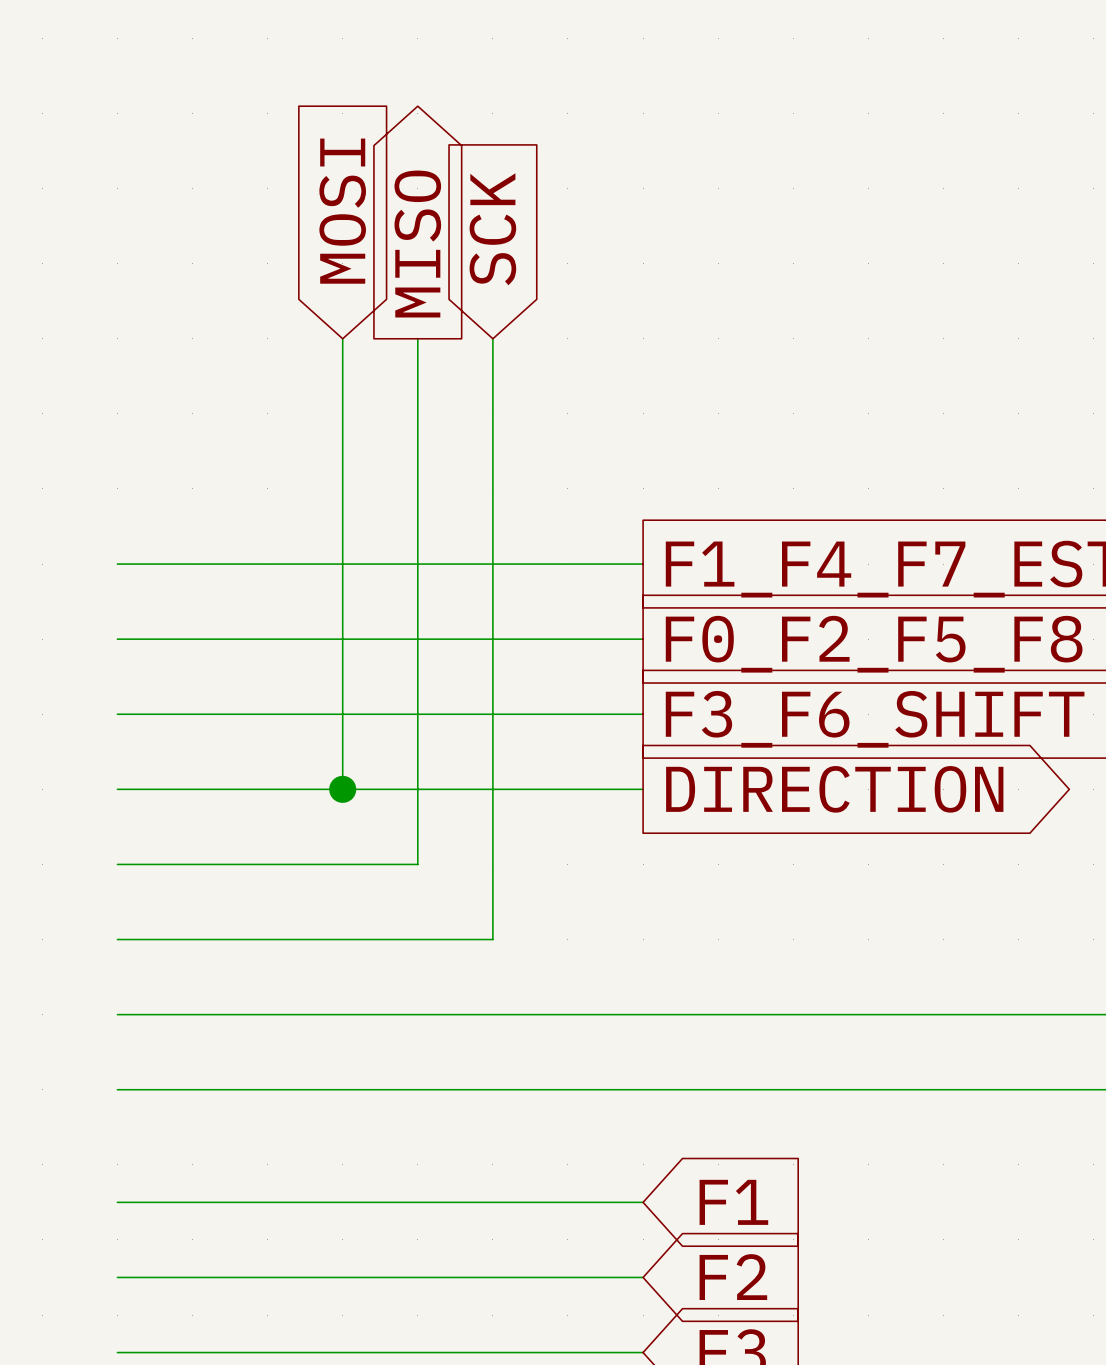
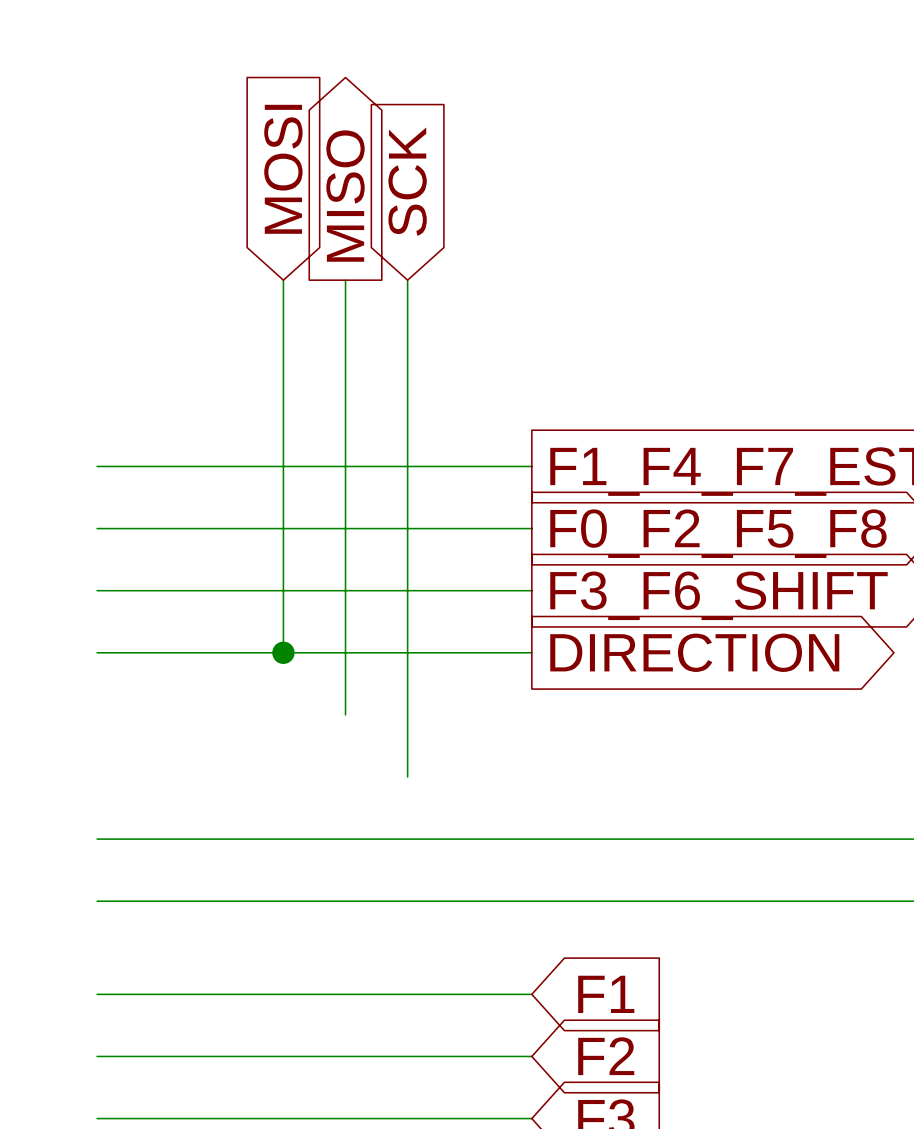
wire: (117, 864) (417, 864) -> none
wire: (117, 939) (492, 939) -> none

